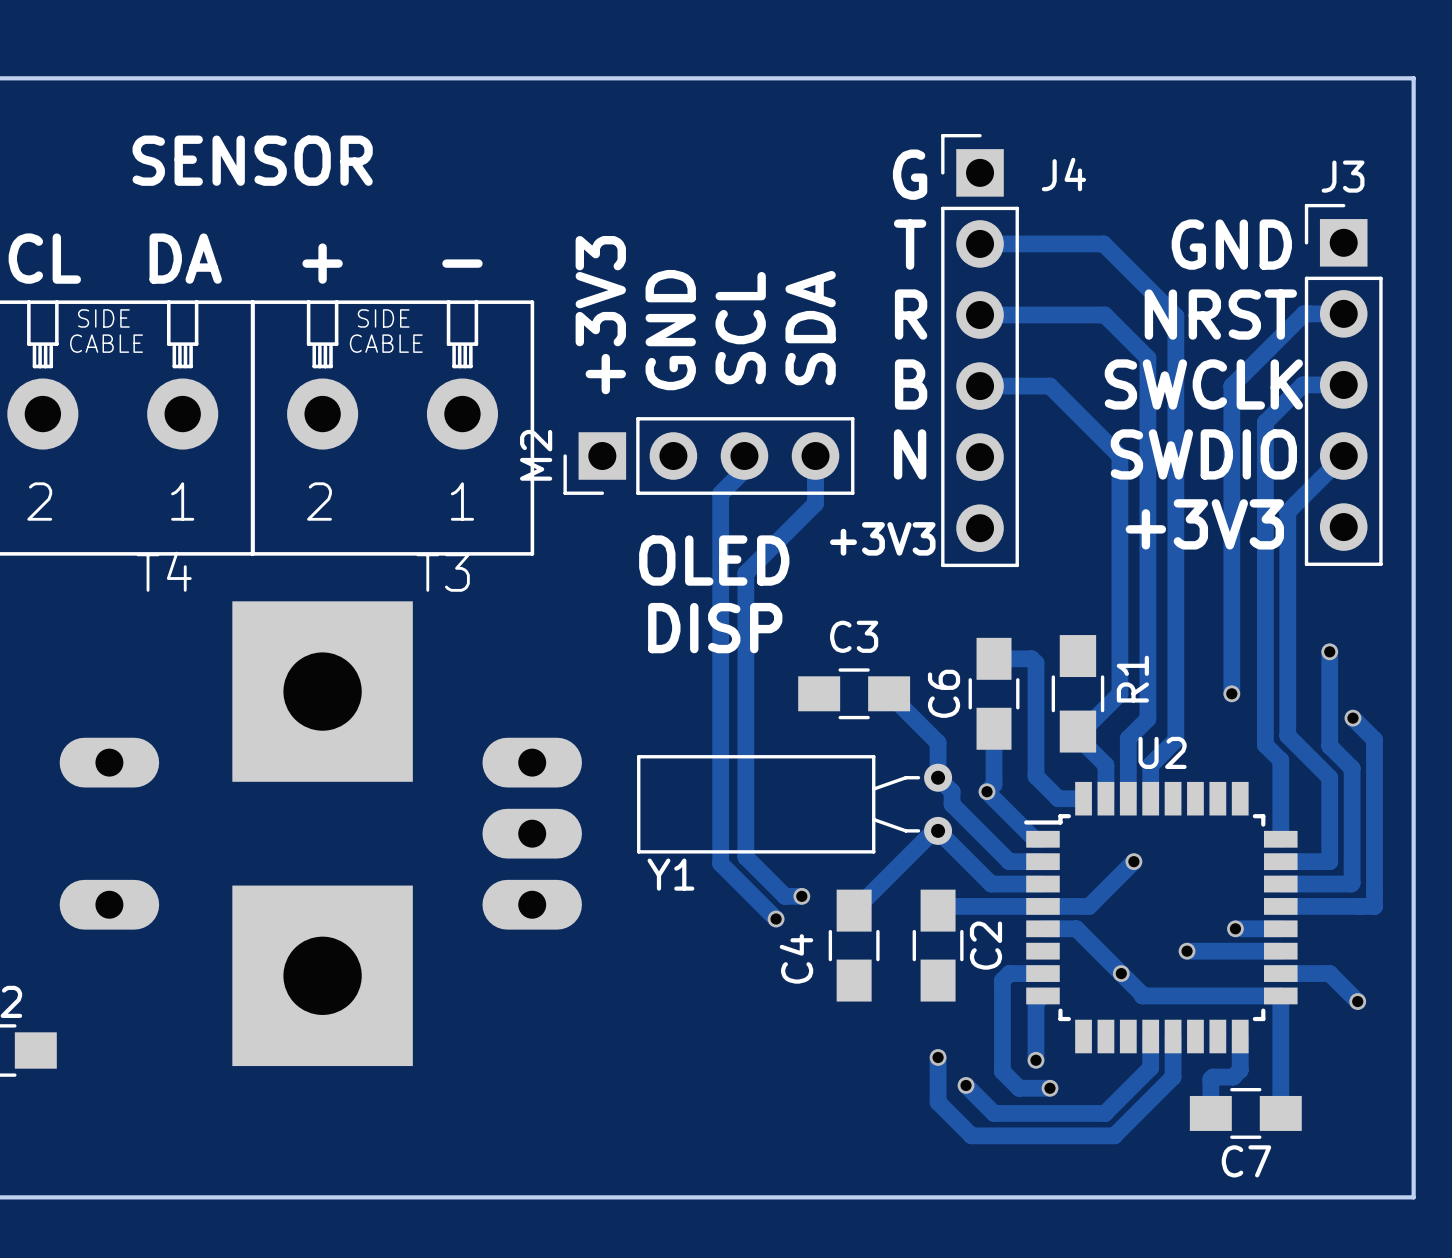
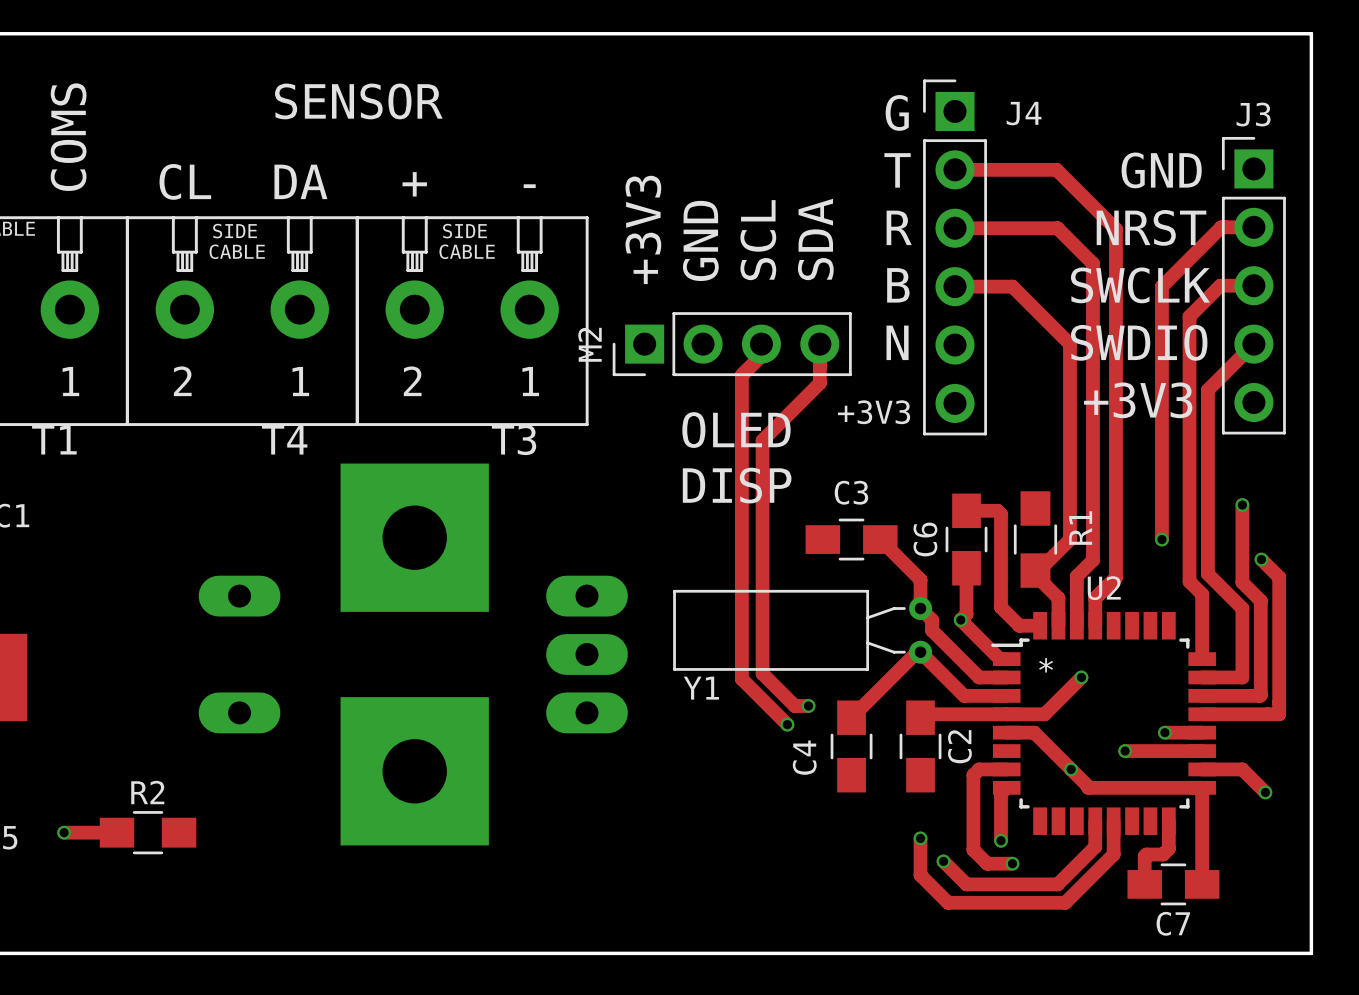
U2 text: none -> * (1046, 665)

